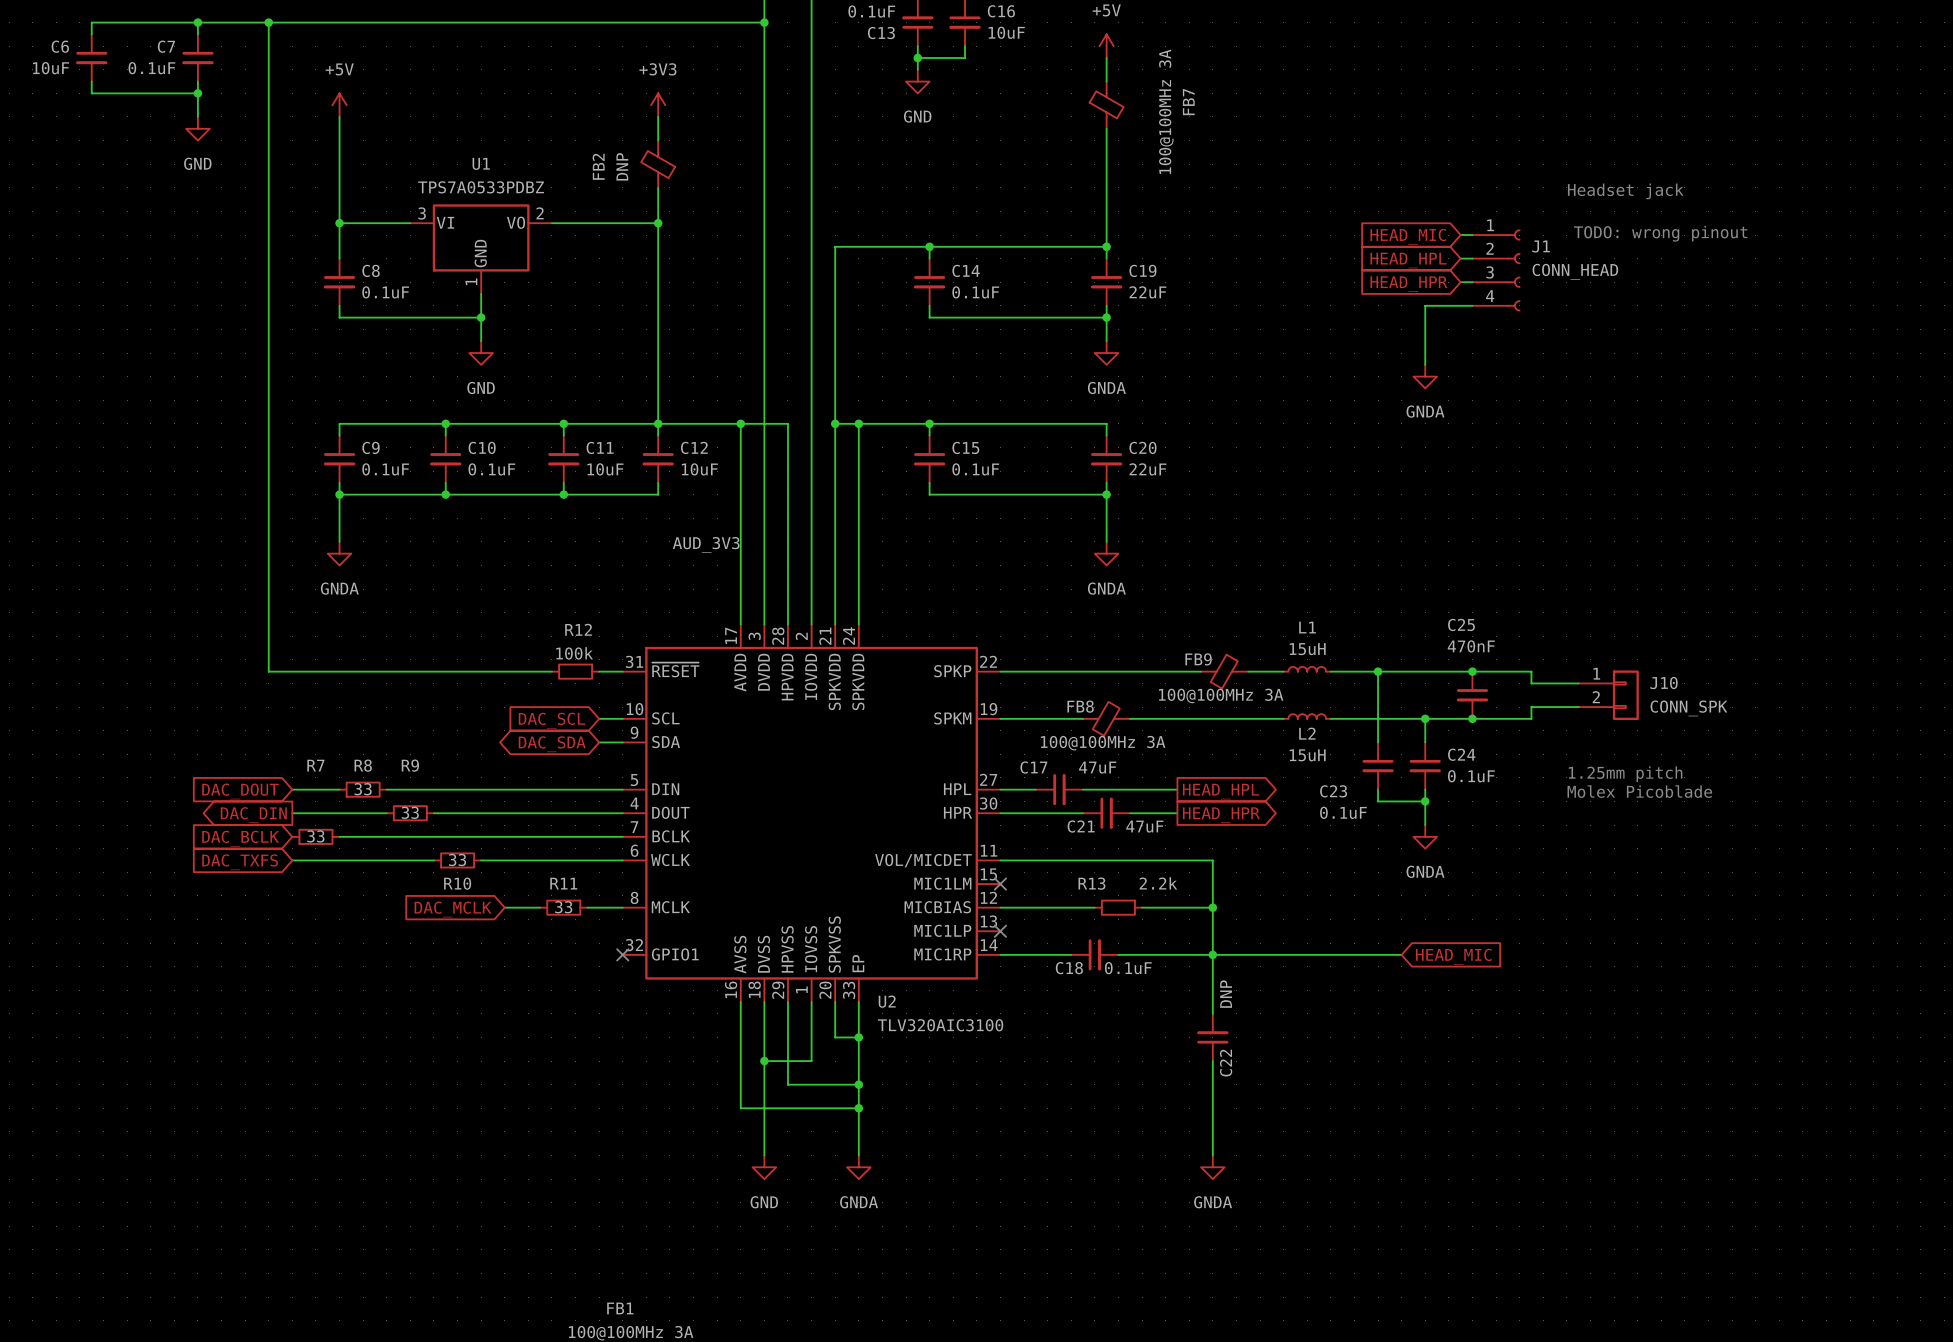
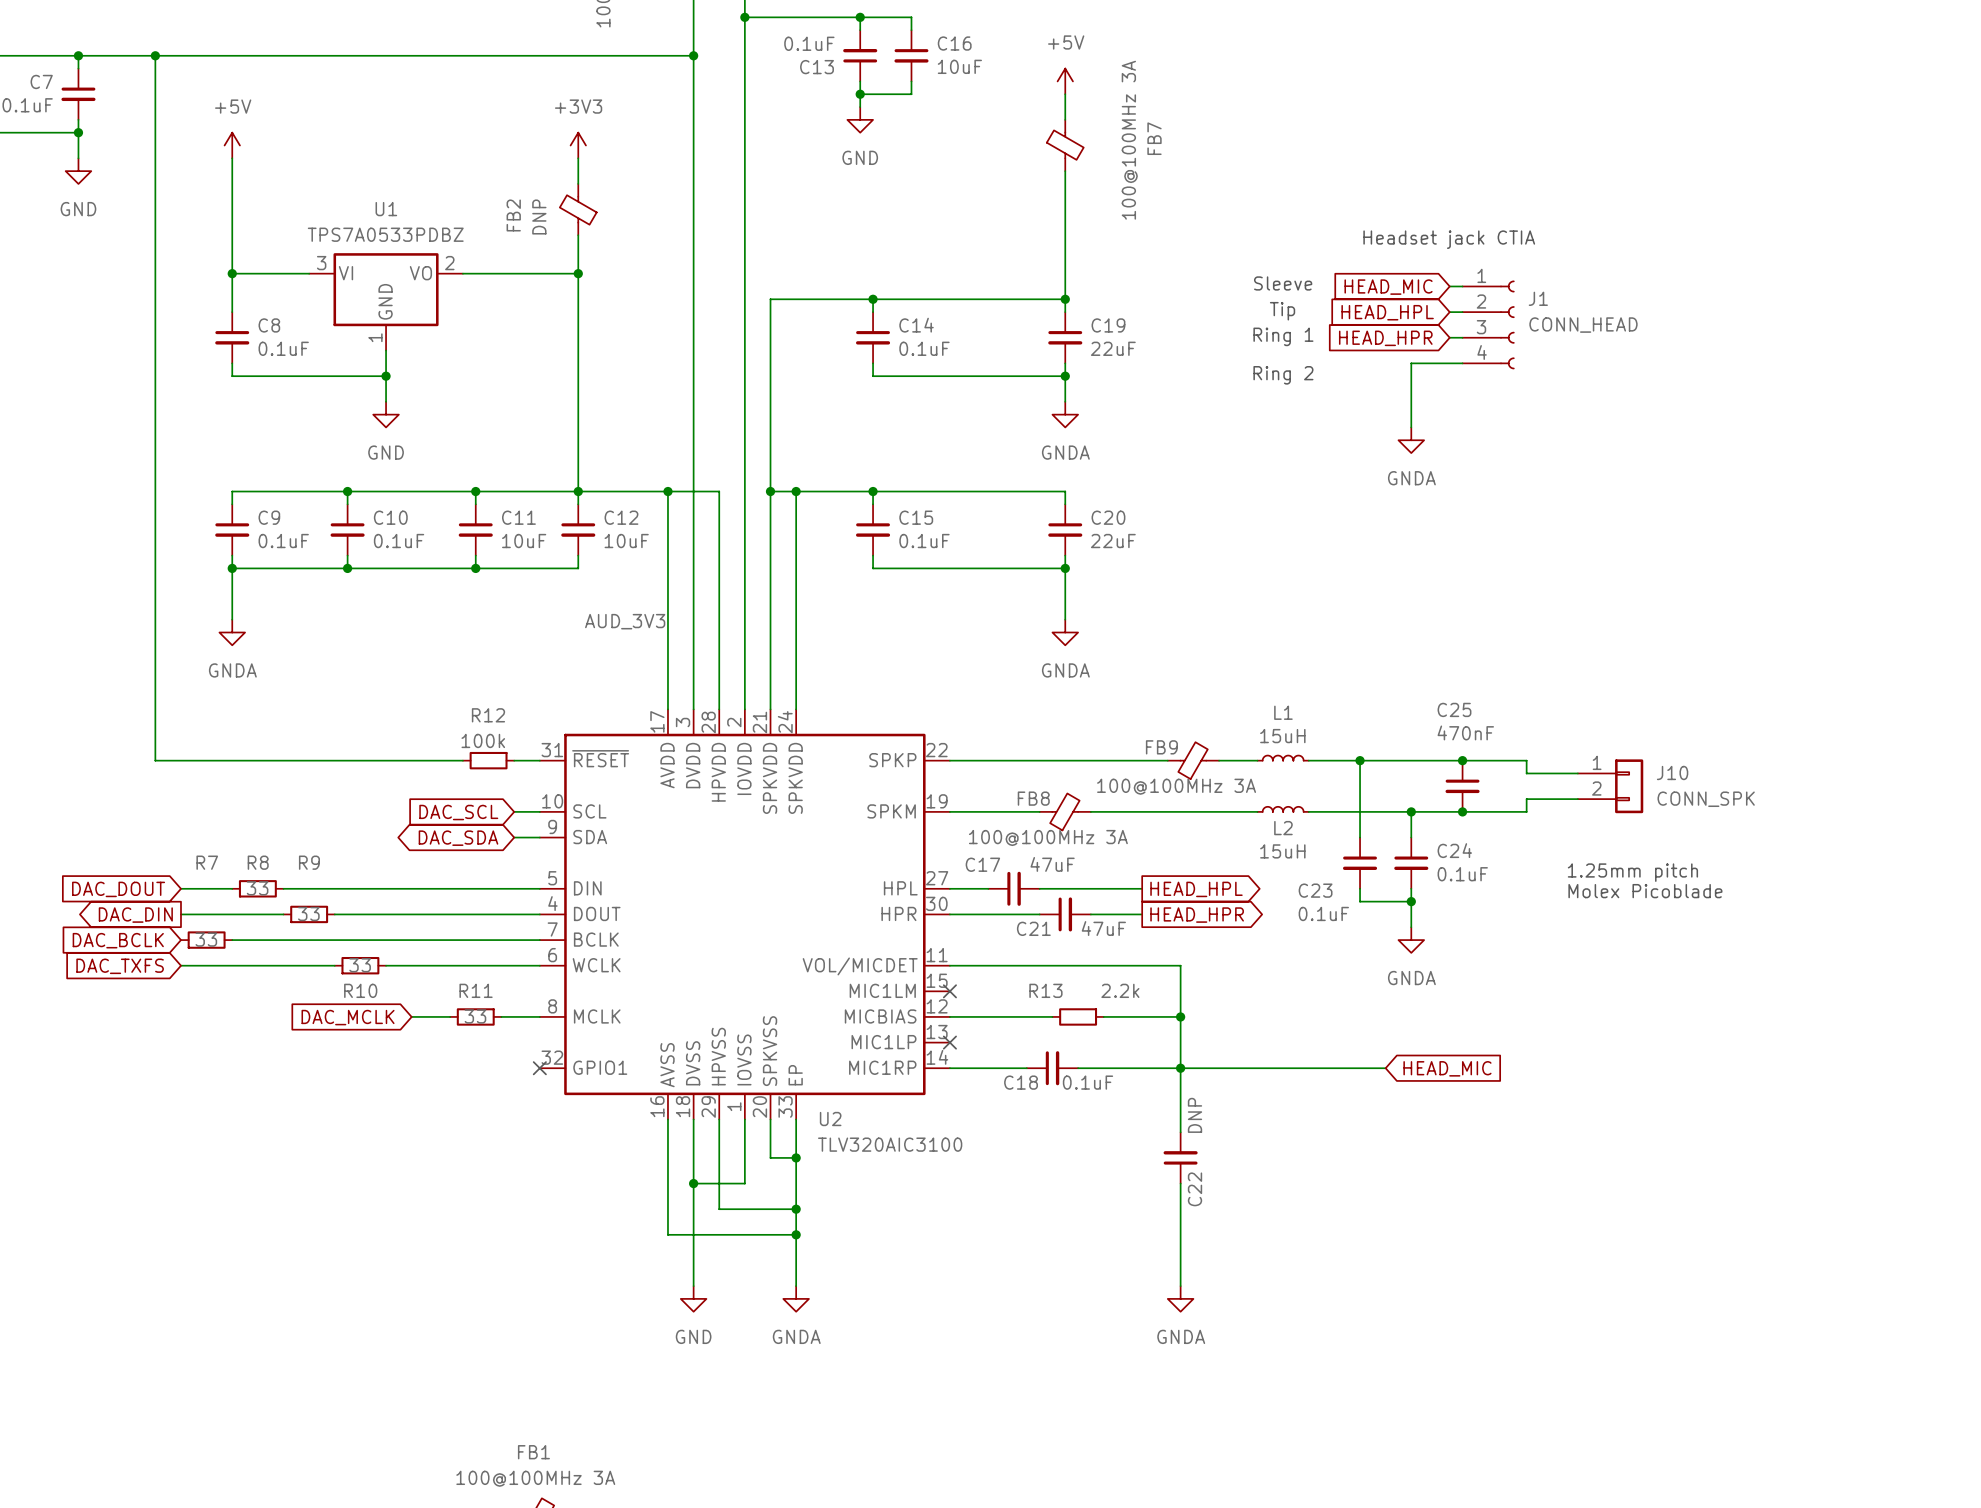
text: Headset jack (1625, 191) -> Headset jack CTIA (1449, 239)
text: none -> Sleeve (1283, 283)
text: TODO: wrong pinout (1660, 233) -> none
text: none -> Tip (1282, 311)
text: none -> Ring 1 (1283, 336)
text: none -> Ring 2 (1283, 375)

